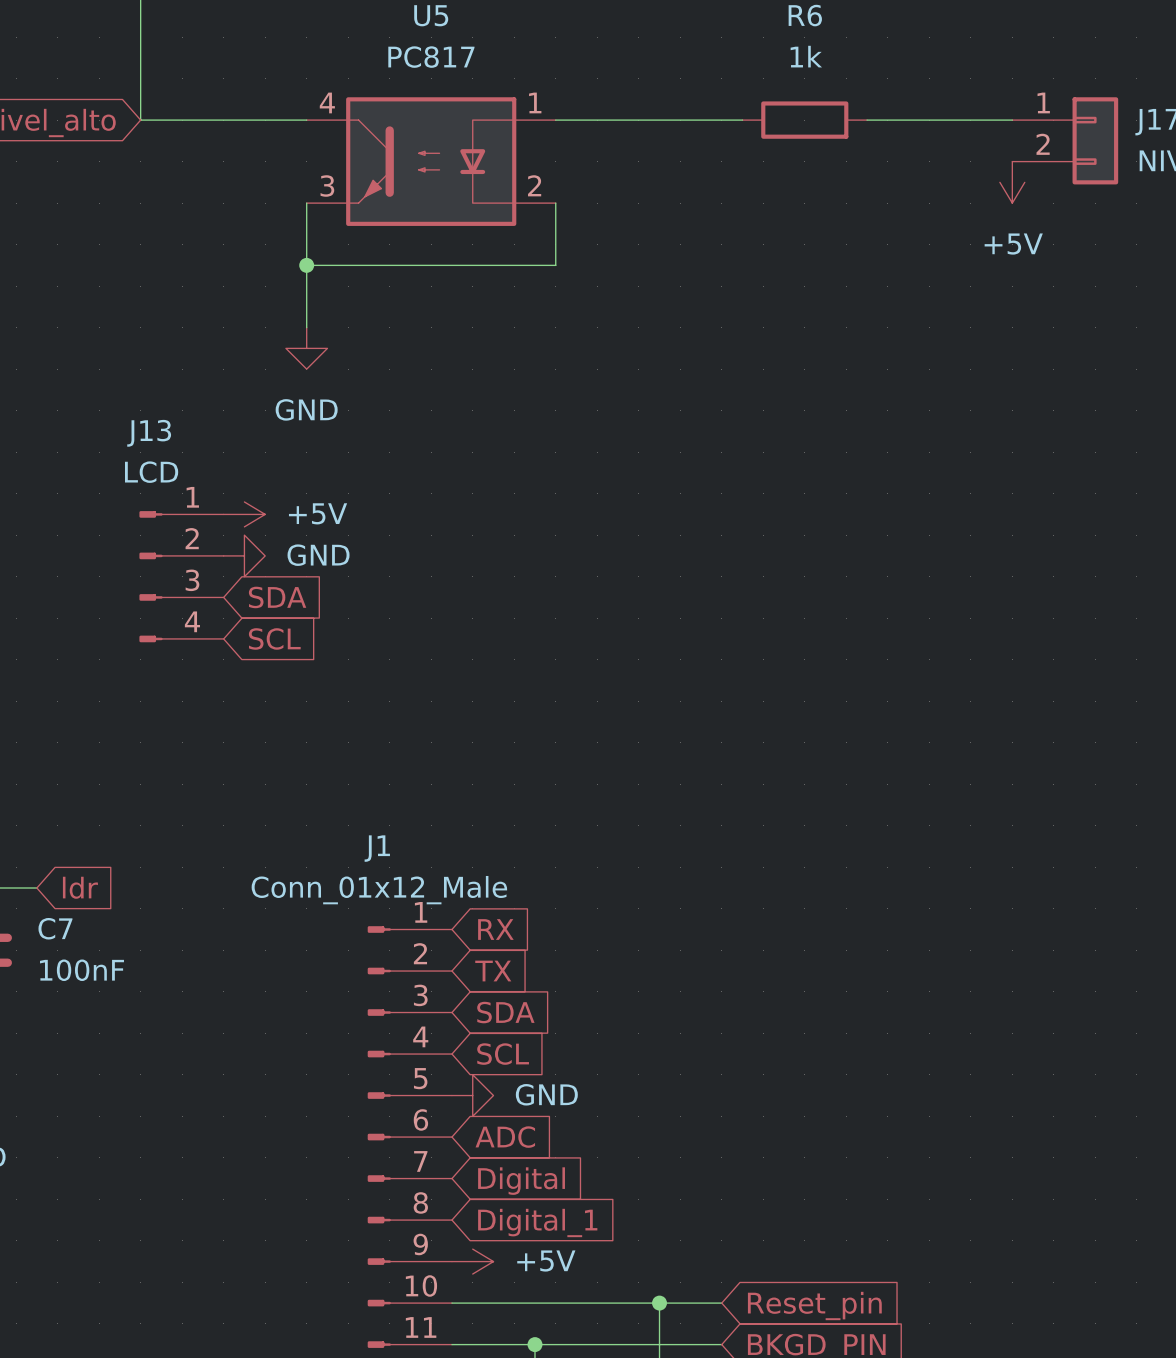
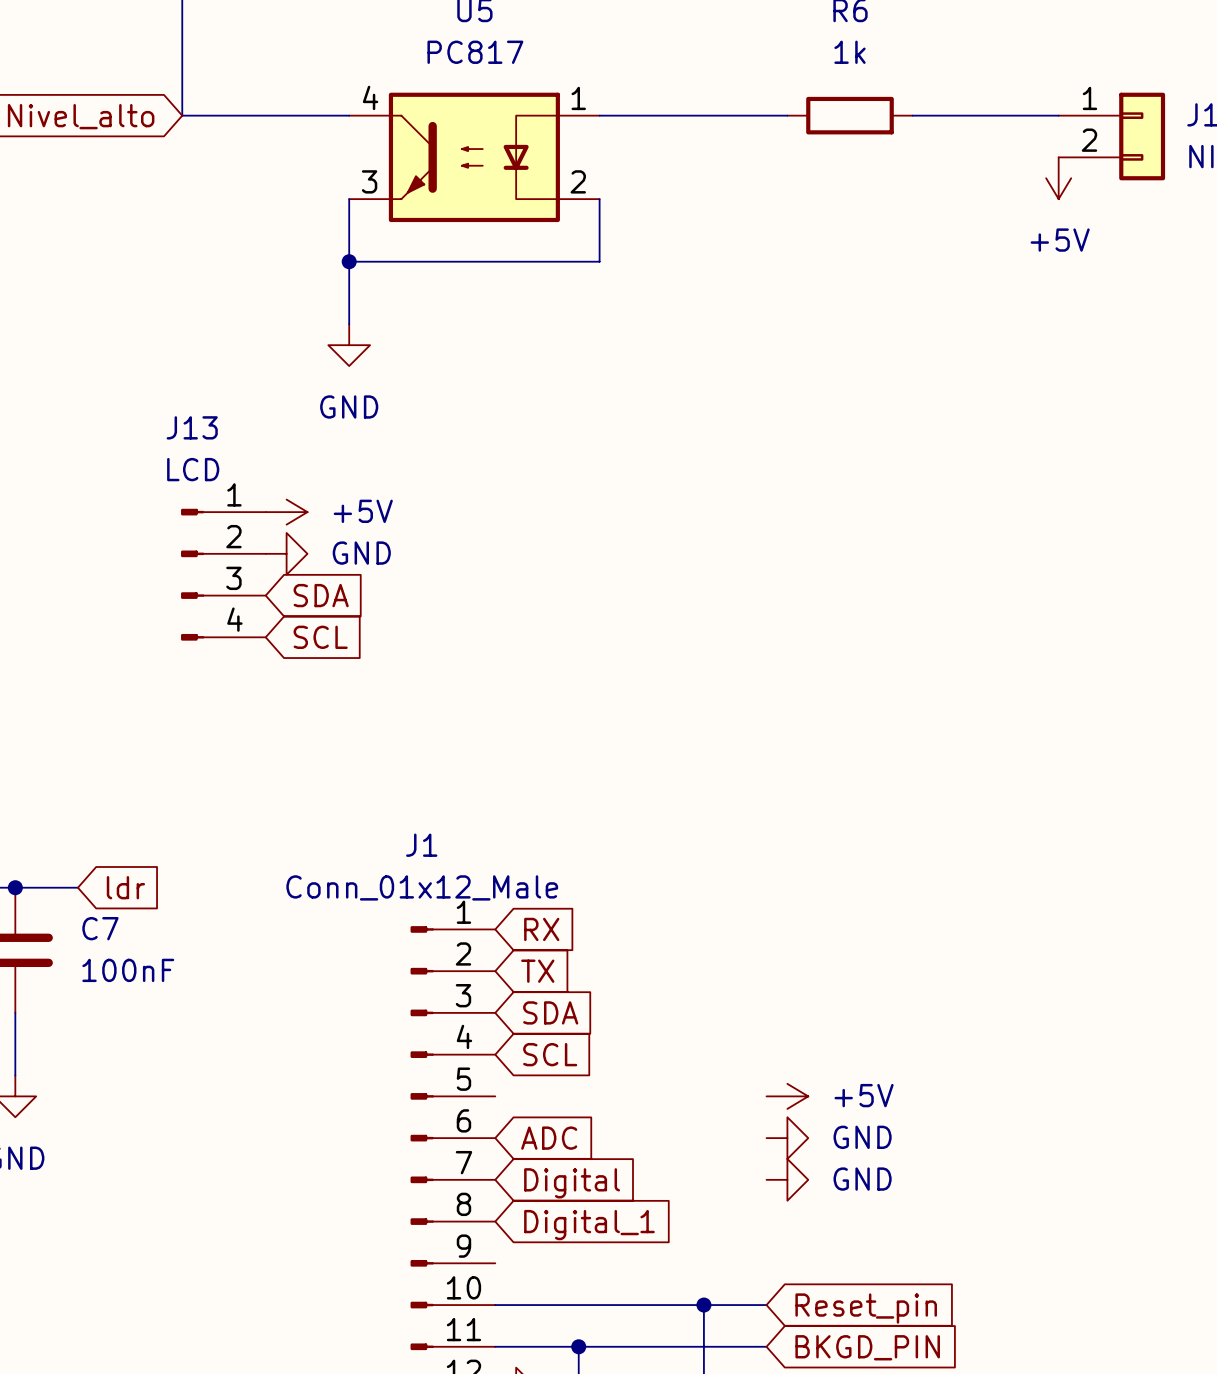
power symbol: GND (472, 1095) -> none
power symbol: none -> GND (787, 1138)
power symbol: none -> GND (787, 1179)
power symbol position: +5V (472, 1261) -> +5V (787, 1096)

